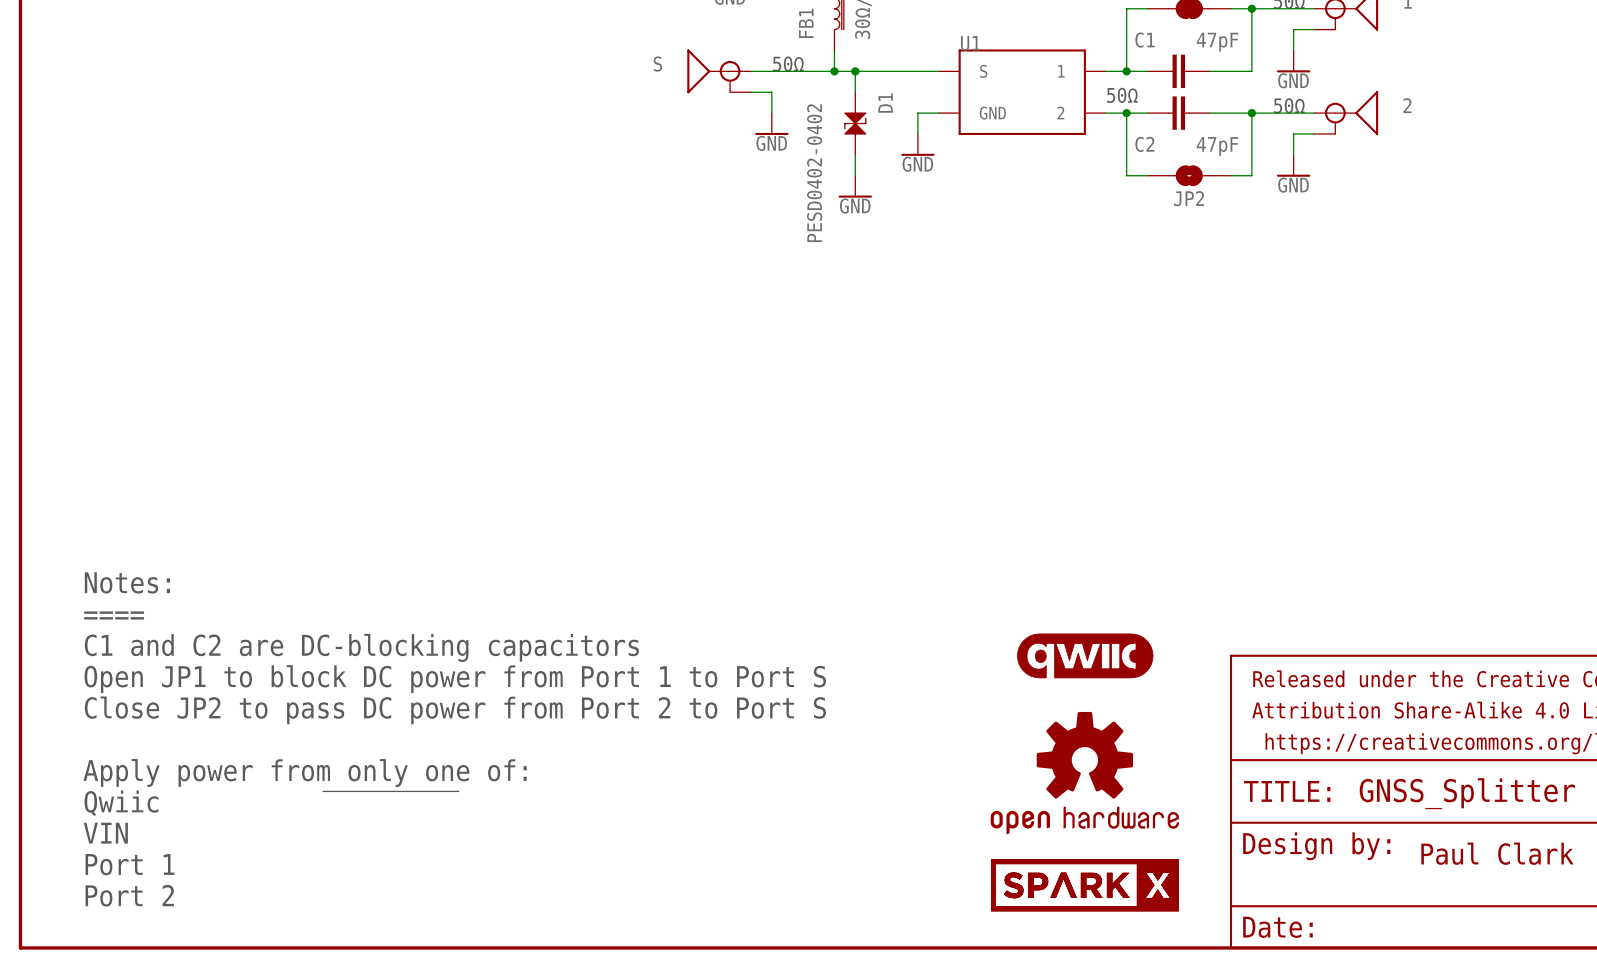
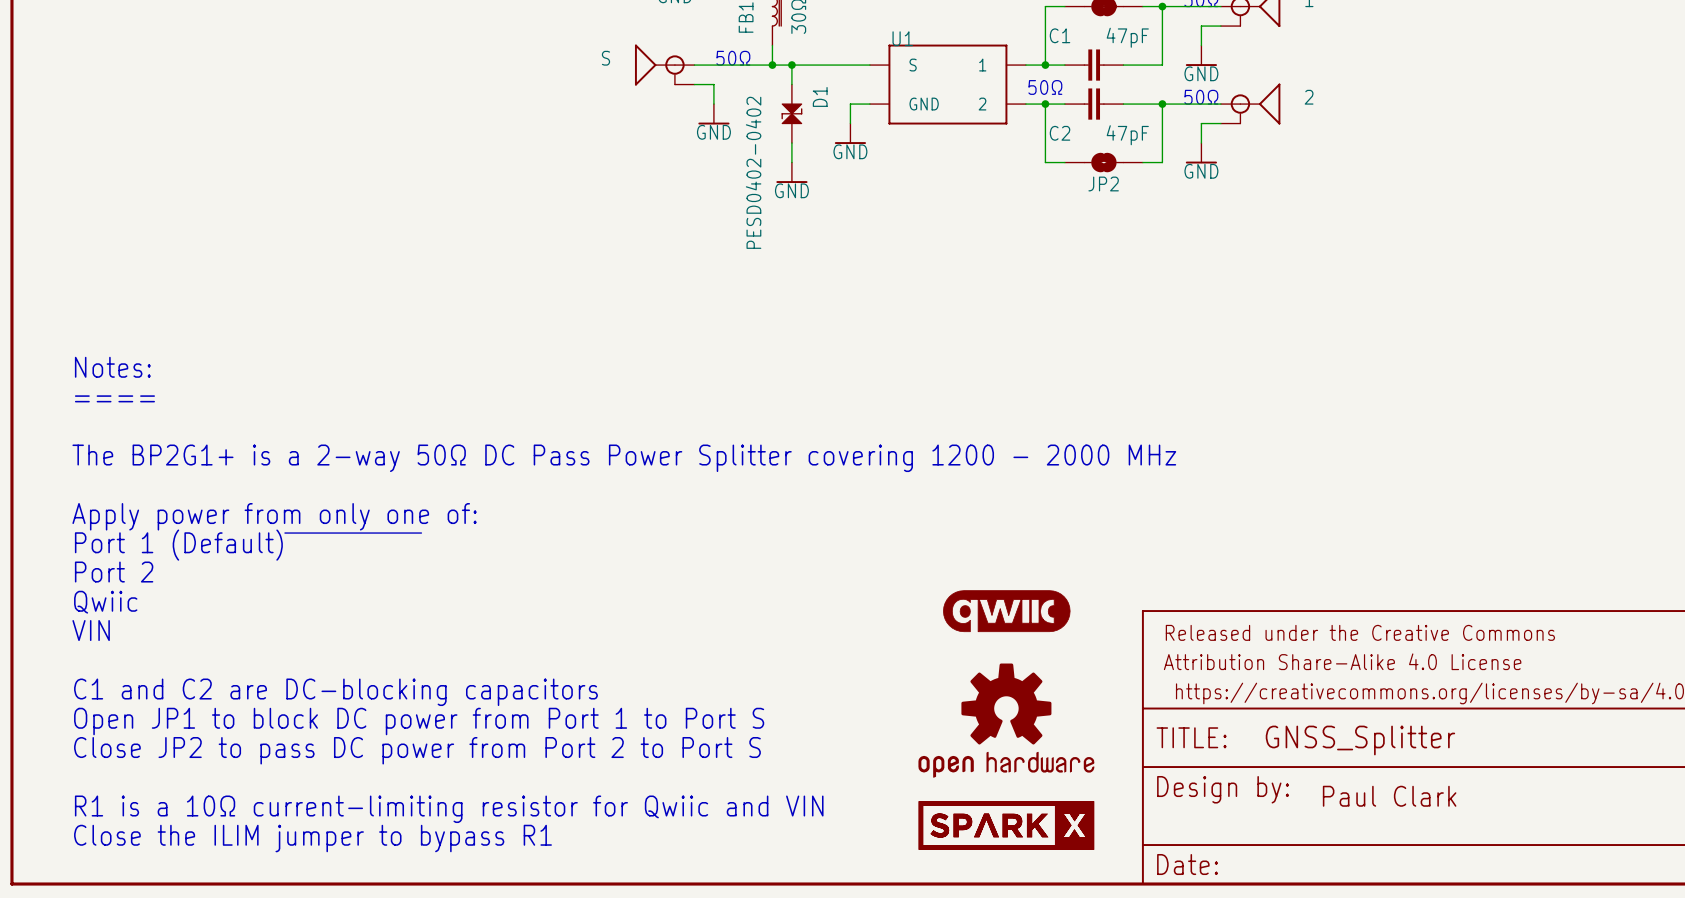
text: none -> Notes: (112, 367)
text: none -> ==== (114, 398)
text: none -> The BP2G1+ is a 2-way 50Ω DC Pass Power Splitter covering 1200 - 2000 MHz (624, 458)
text: none -> Apply power from only one of: (274, 516)
line: none -> (284, 533) (421, 533)
text: Notes: (127, 582) -> Port 1 (Default) (178, 545)
text: ==== (114, 615) -> Port 2 (114, 572)
text: C1 and C2 are DC-blocking capacitors (361, 647) -> Qwiic (105, 602)
text: Open JP1 to block DC power from Port 1 to Port S (455, 679) -> VIN (91, 630)
text: Close JP2 to pass DC power from Port 2 to Port S (455, 710) -> none
text: none -> C1 and C2 are DC-blocking capacitors (335, 692)
text: Apply power from only one of: (305, 773) -> Open JP1 to block DC power from Port 1 to Port S (419, 721)
line: (323, 791) (458, 791) -> none
text: Qwiic (121, 803) -> Close JP2 to pass DC power from Port 2 to Port S (417, 750)
text: VIN (105, 833) -> none
text: Port 1 (129, 864) -> R1 is a 10Ω current-limiting resistor for Qwiic and VIN (449, 809)
text: Port 2 (129, 895) -> Close the ILIM jumper to bypass R1 (313, 838)

